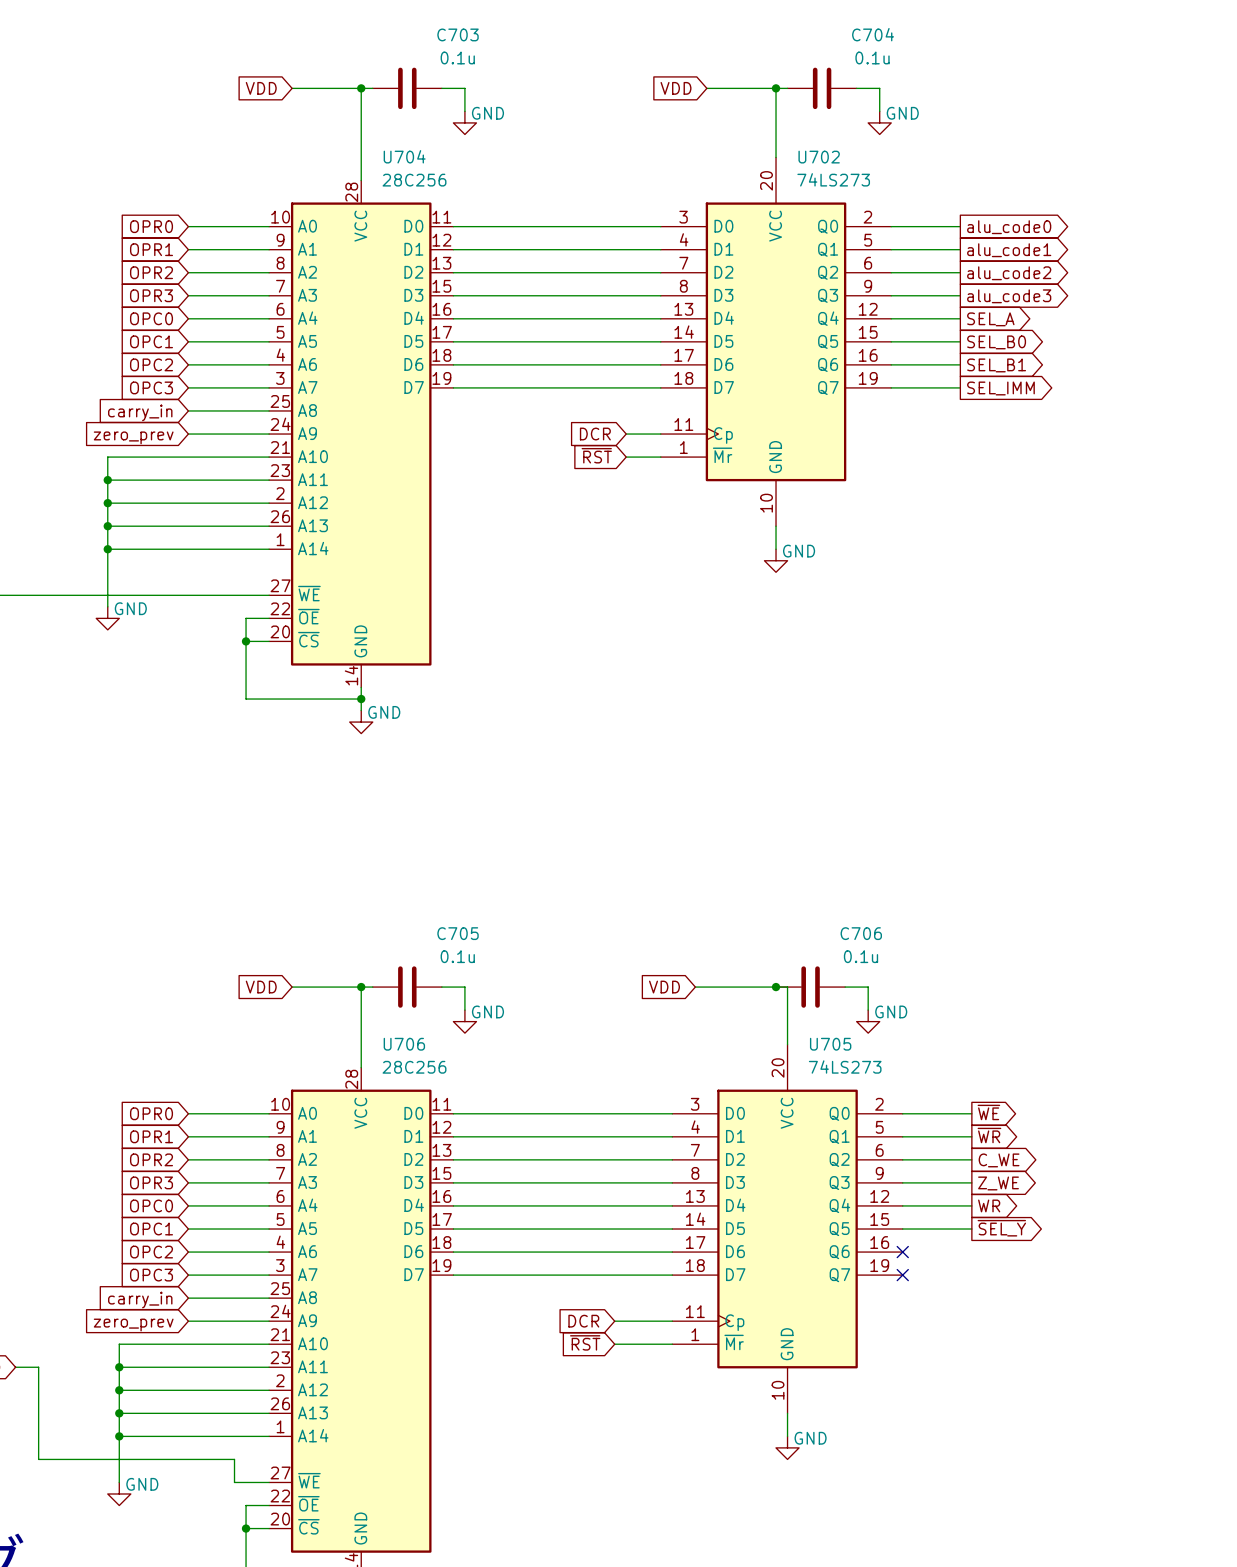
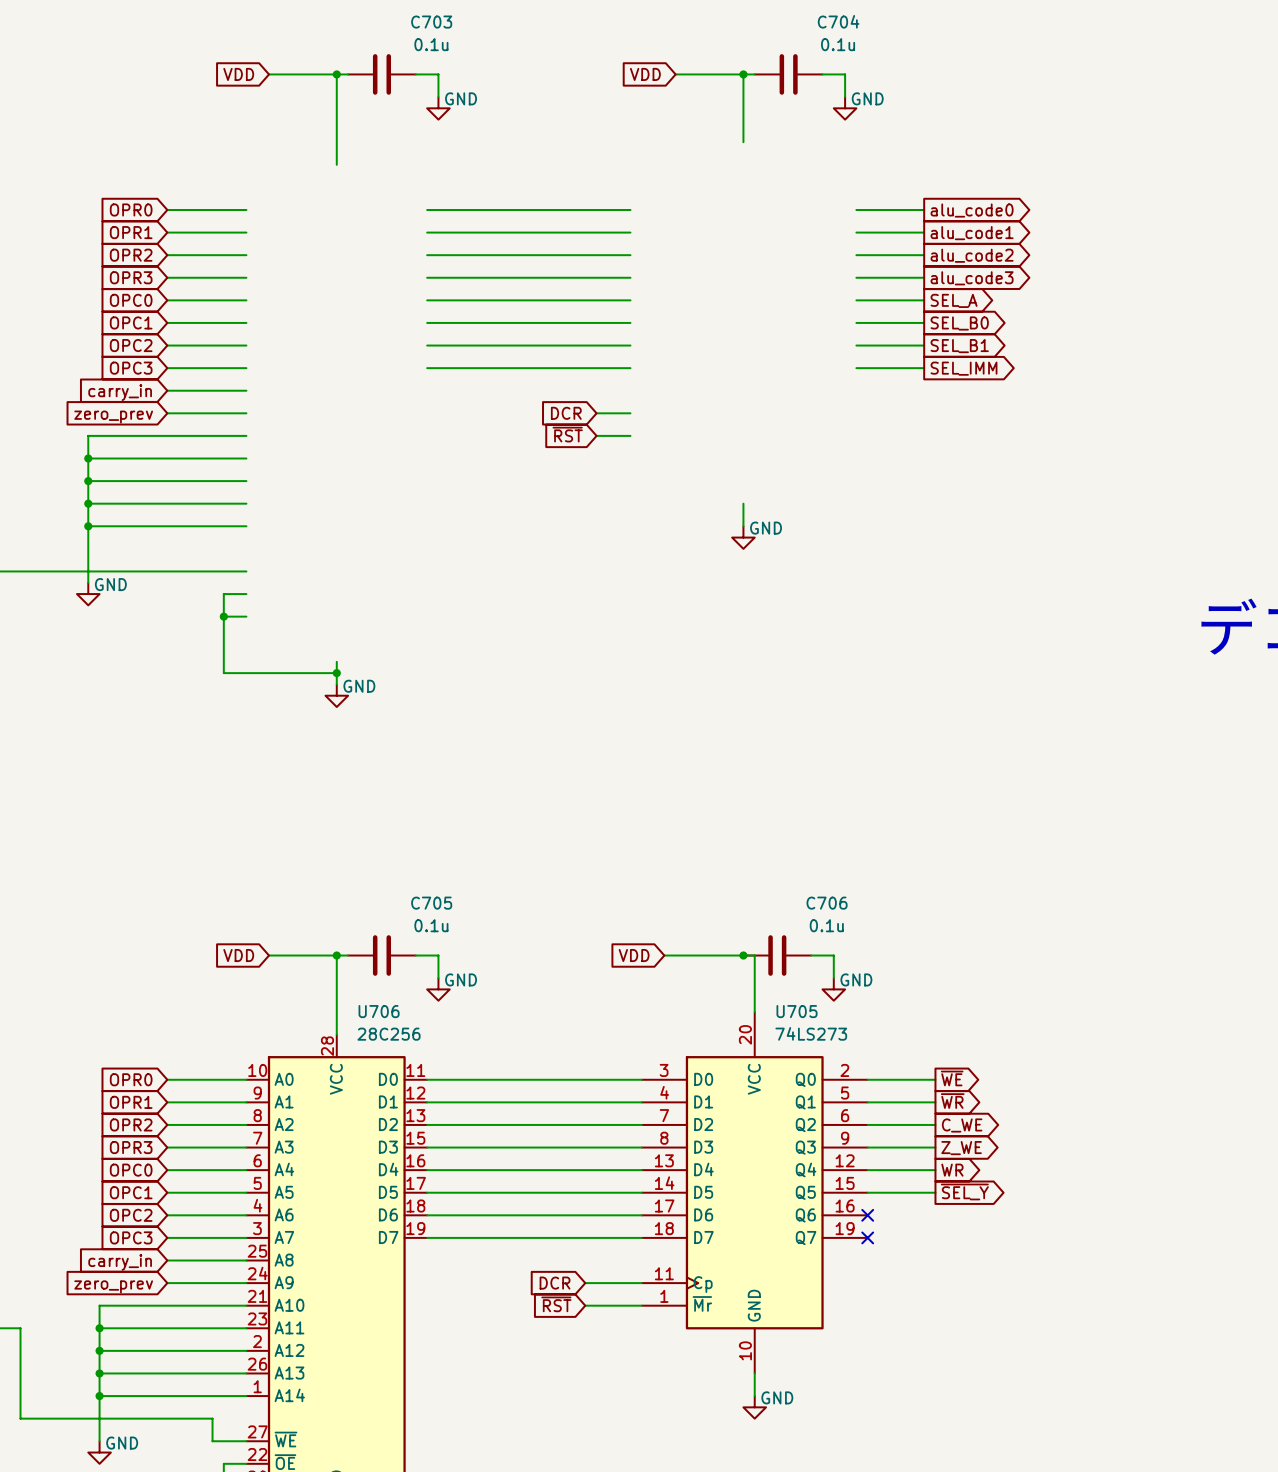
U702: 74LS273 (776, 341) -> none
U704: 28C256 (361, 434) -> none

